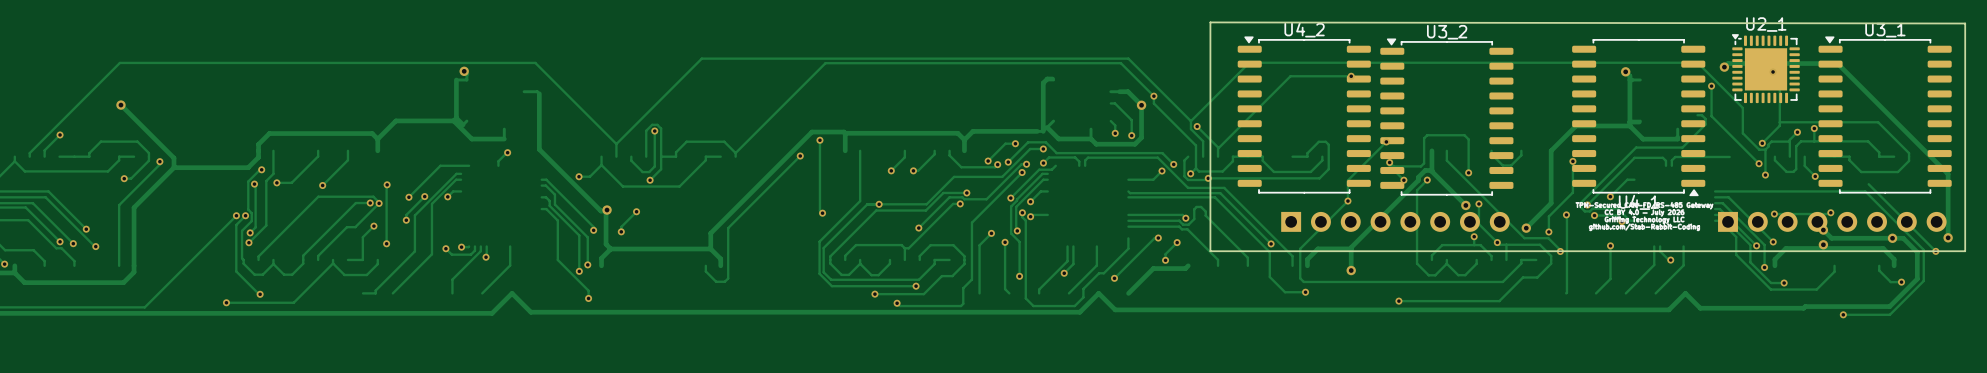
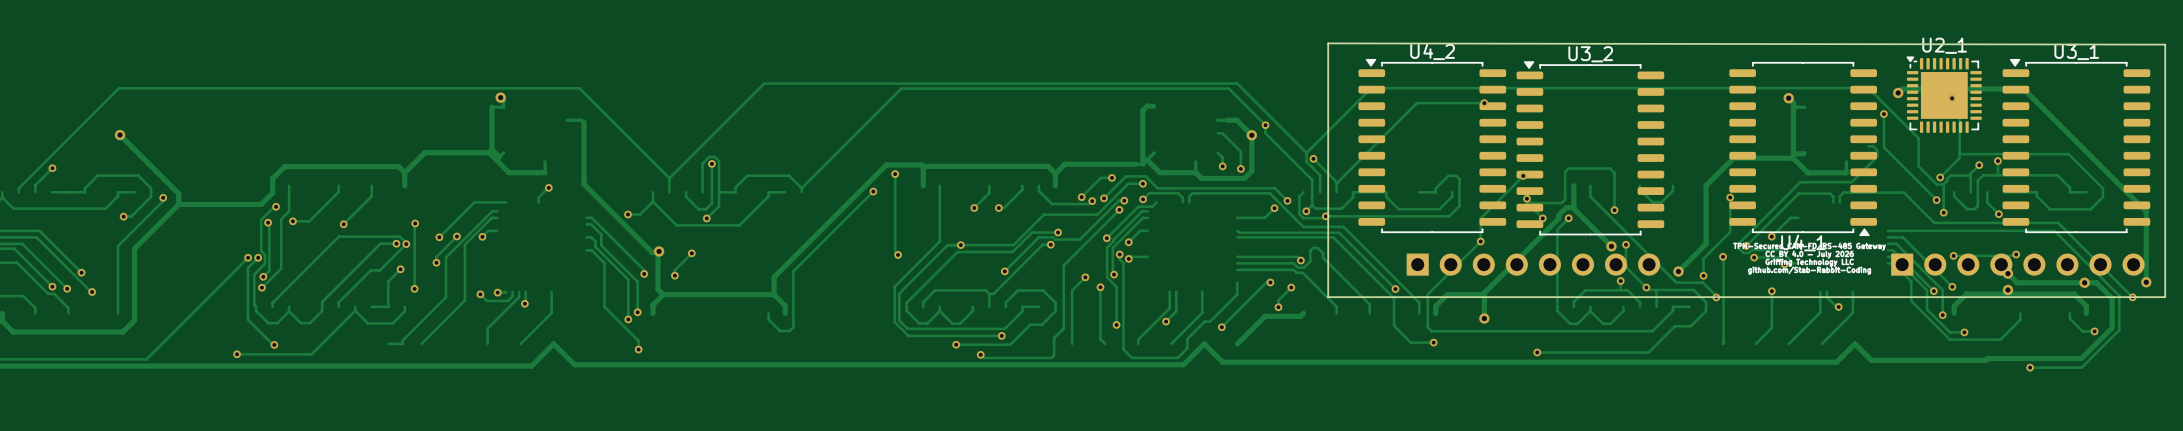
track: none -> (1904, 192) (1934, 222) (2058, 222)

